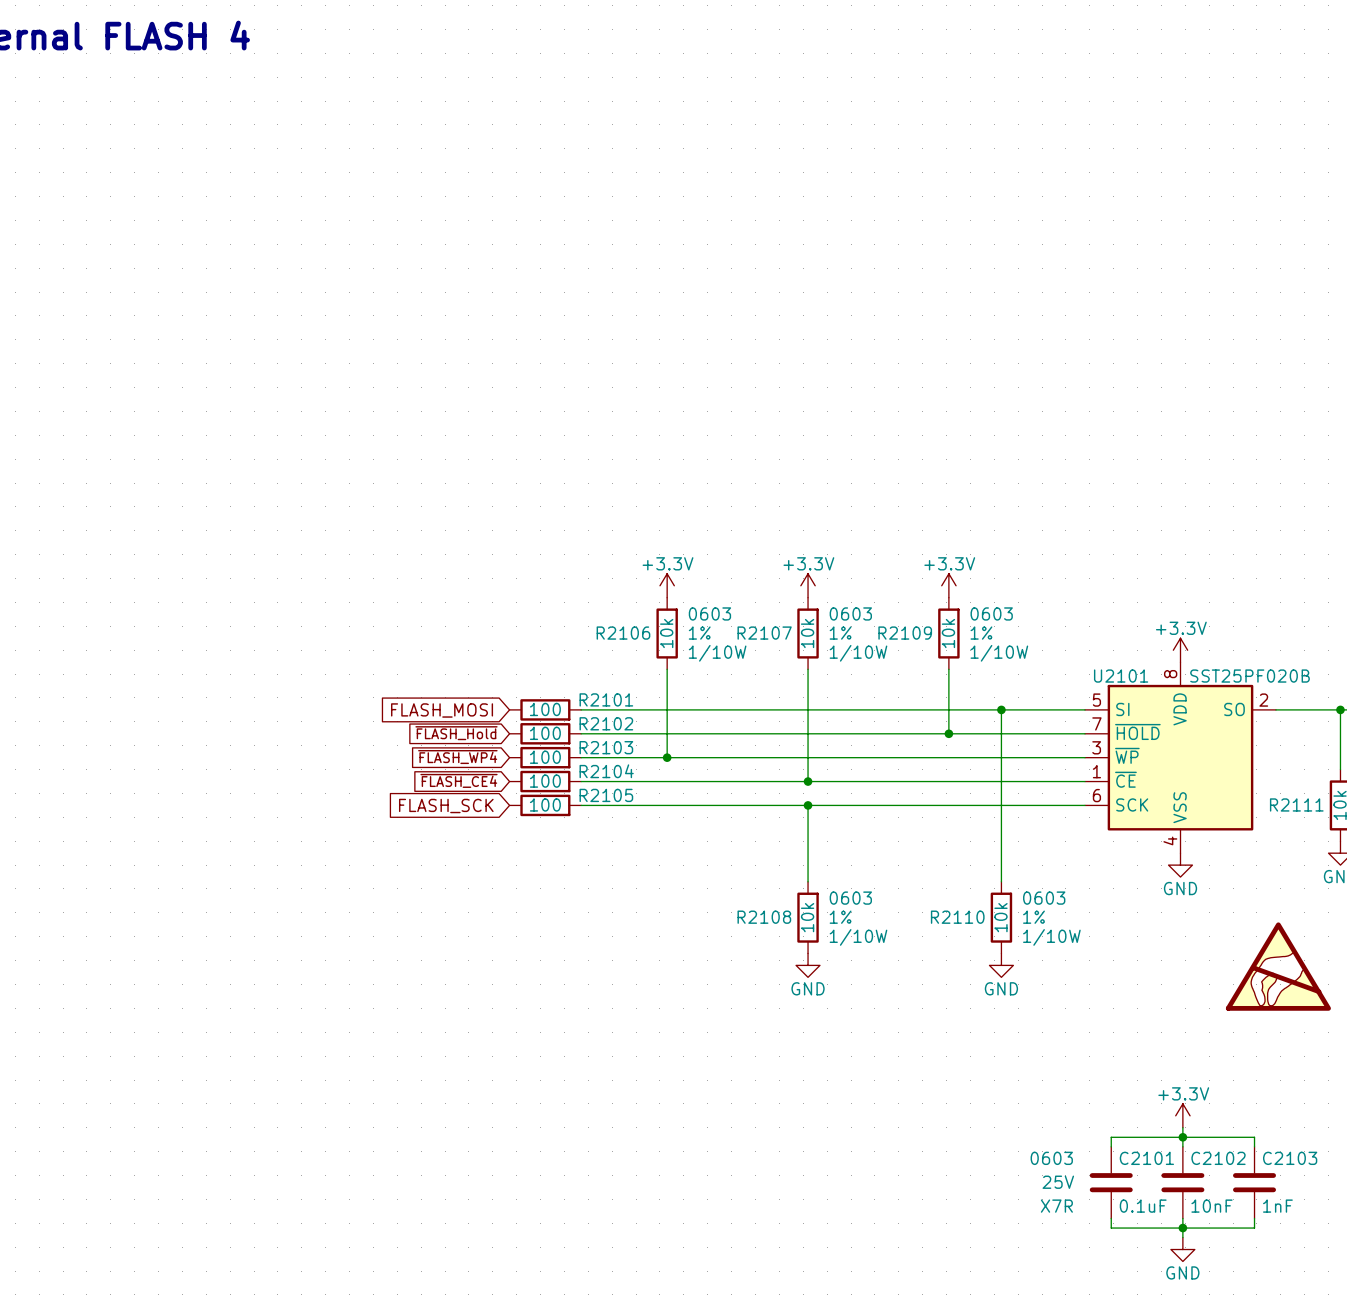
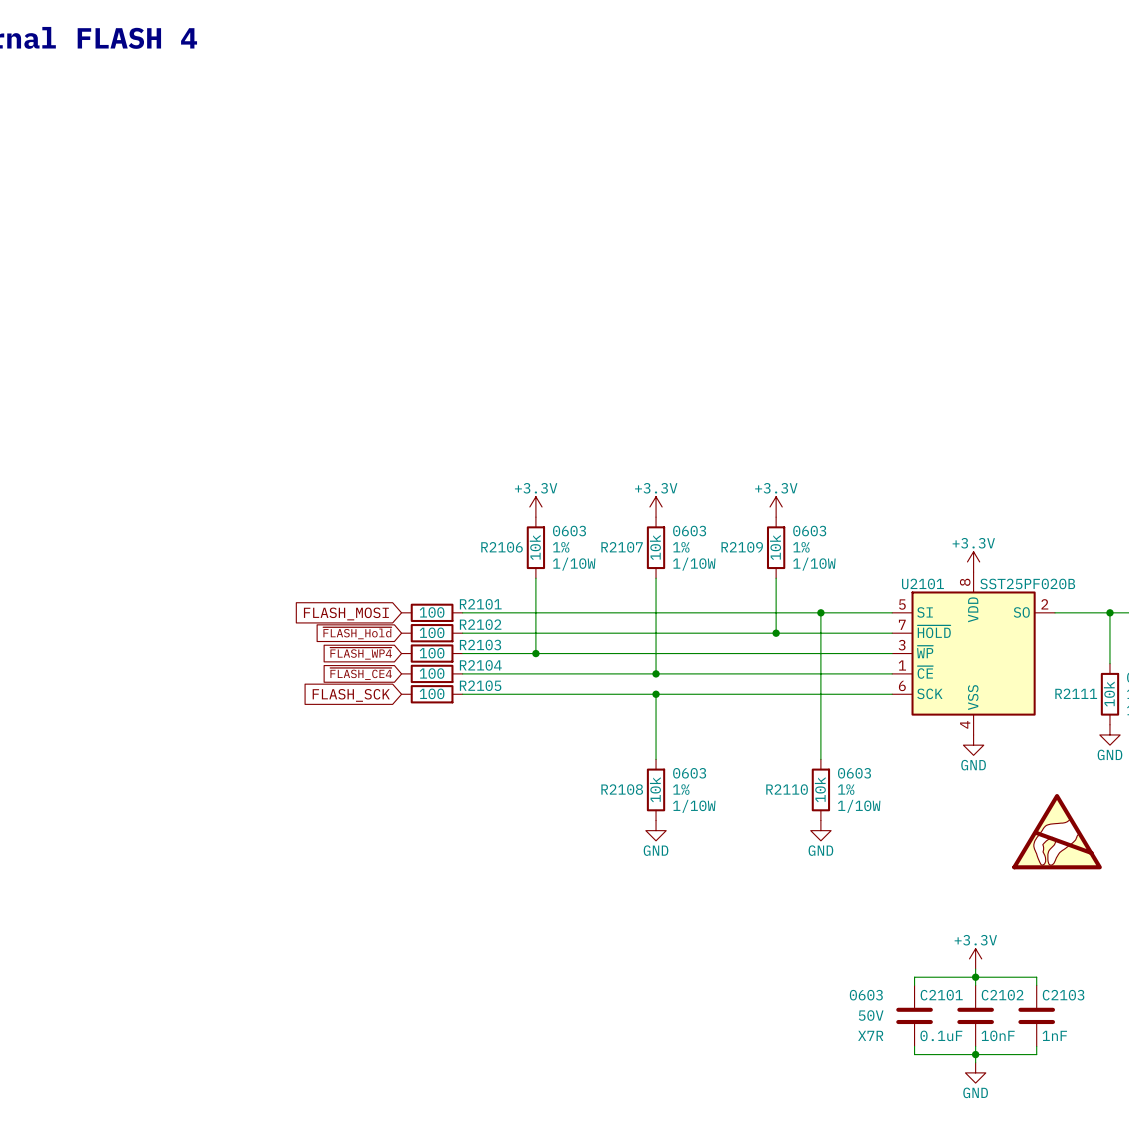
C2101 text: 25V (1058, 1182) -> 50V (871, 1015)

